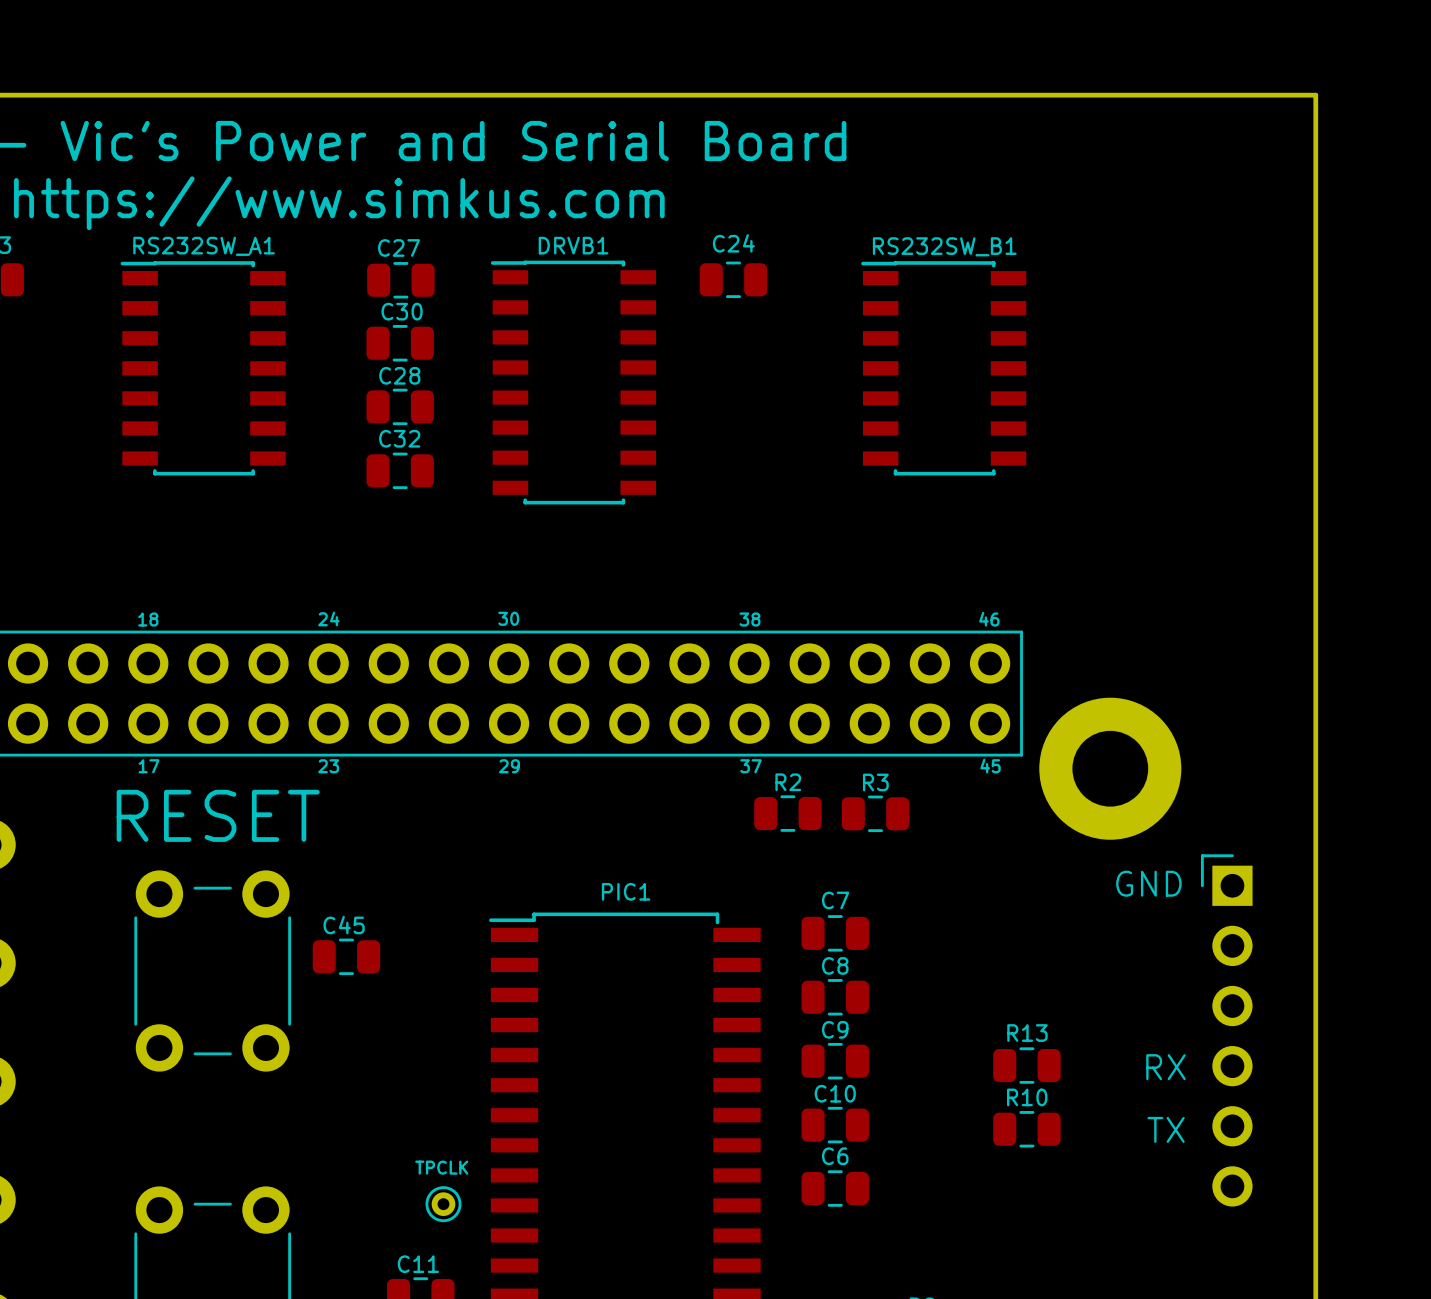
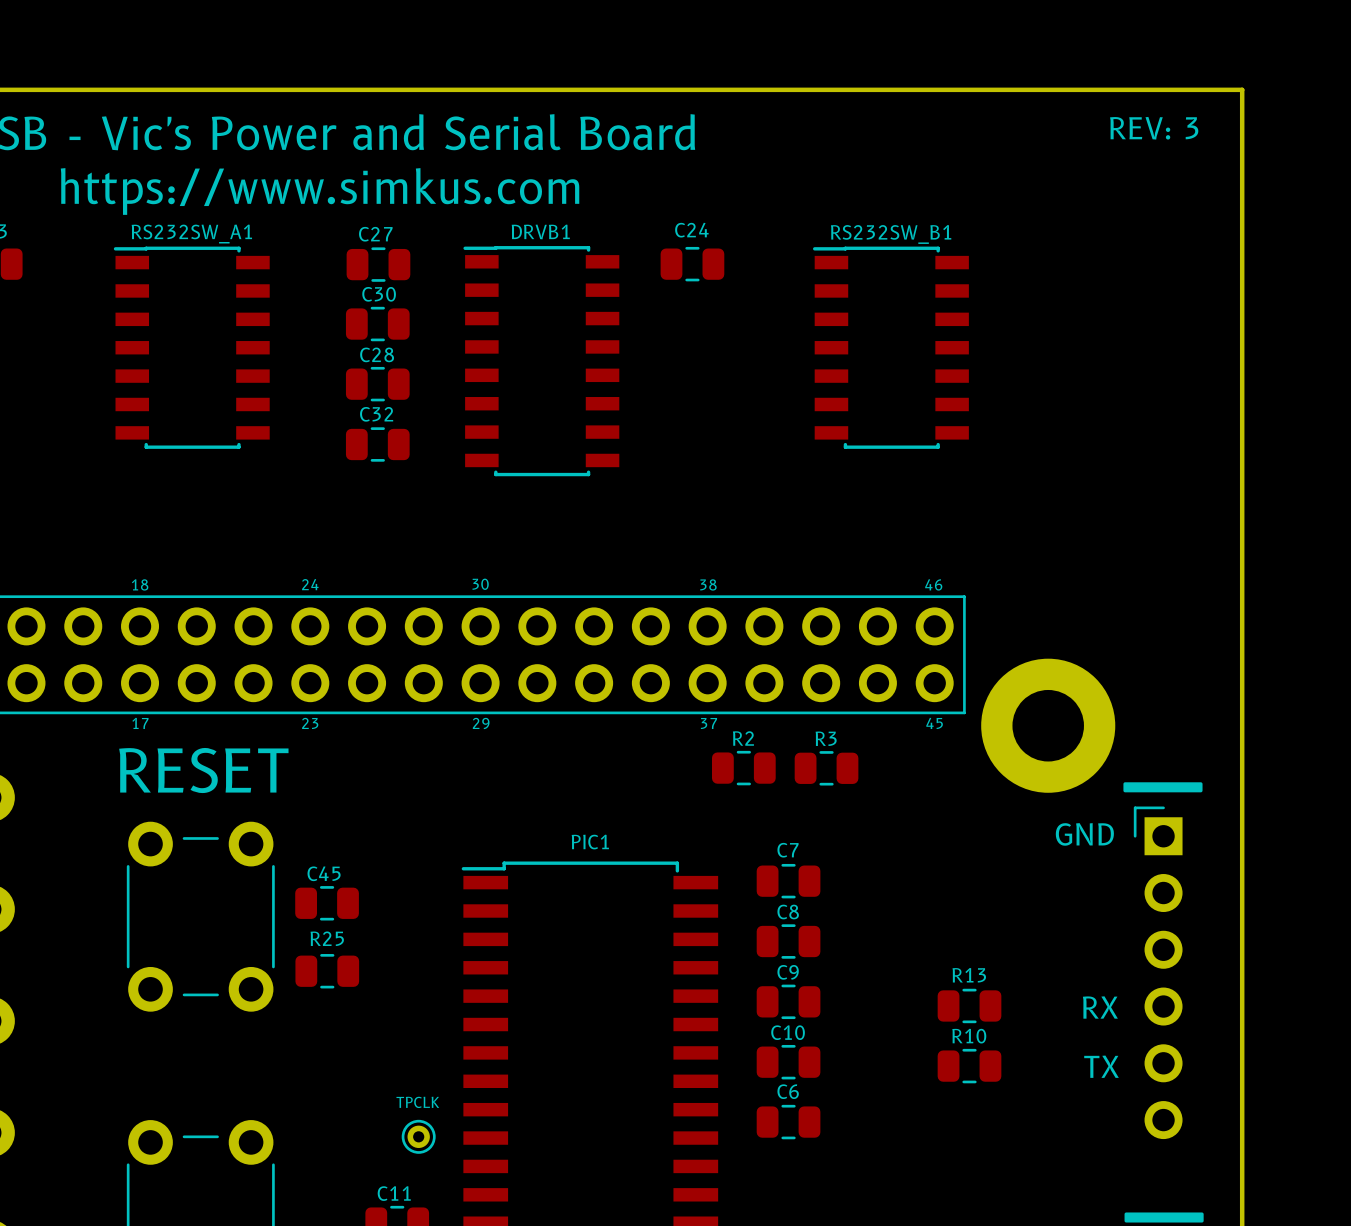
text: none -> REV: 3 (1154, 128)
drawing: none -> [1123, 782, 1203, 793]
R25: none -> (327, 971)
drawing: none -> [1124, 1212, 1204, 1223]

